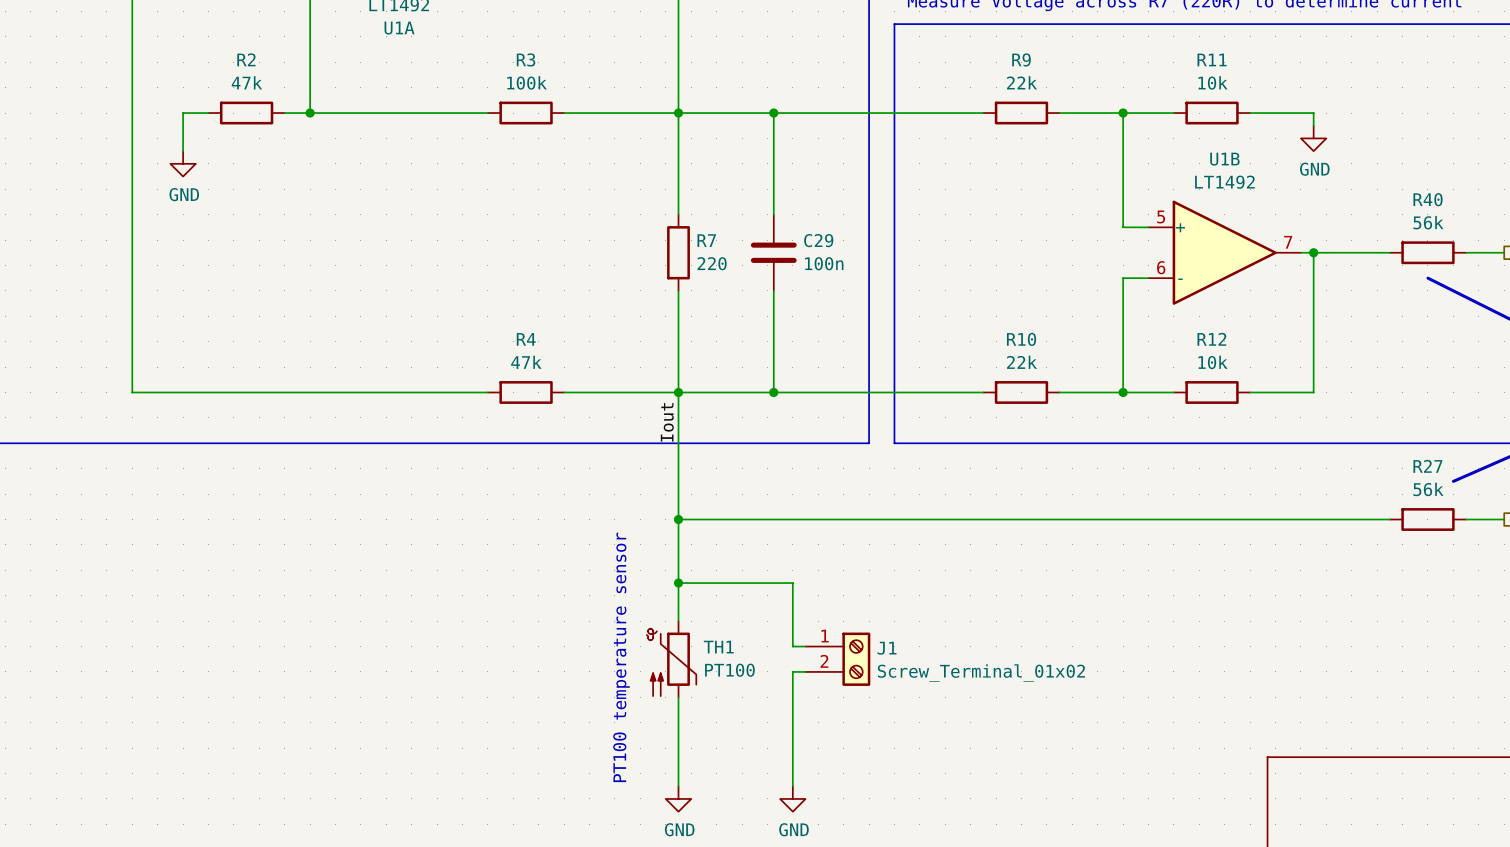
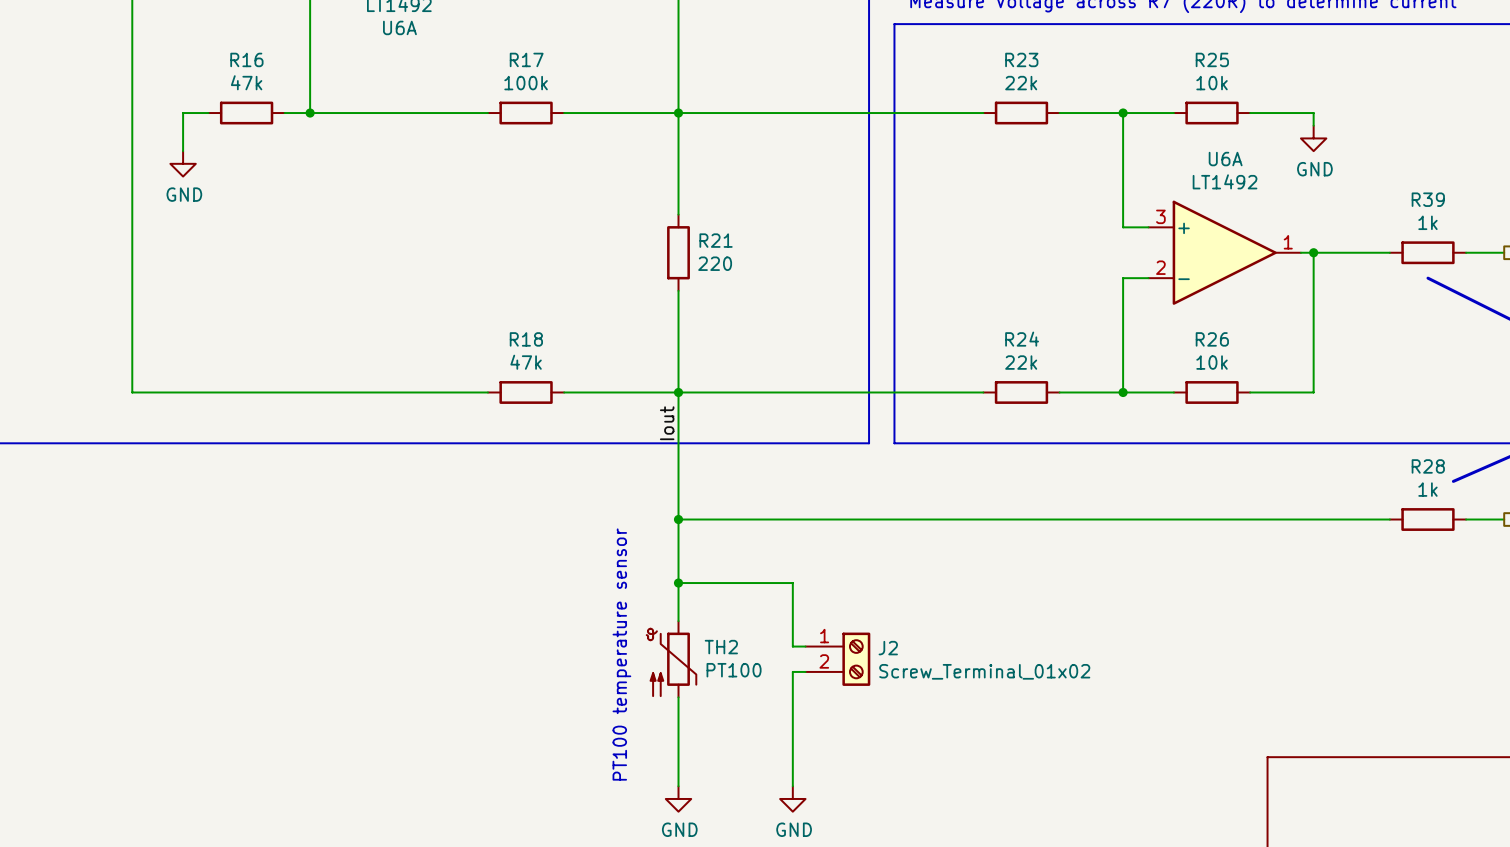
U1A name: U1A (399, 28) -> U6A (399, 27)
R2 name: R2 (246, 59) -> R16 (246, 59)
R3 name: R3 (526, 59) -> R17 (526, 59)
R9 name: R9 (1021, 59) -> R23 (1021, 59)
R11 name: R11 (1212, 59) -> R25 (1212, 59)
wire: (773, 113) (773, 214) -> none
junction: (773, 113) -> none
U1B name: U1B (1224, 159) -> U6A (1225, 159)
R40 name: R40 (1428, 199) -> R39 (1428, 199)
U1B pin number: 5 (1161, 216) -> 3 (1160, 216)
R40 value: 56k (1428, 222) -> 1k (1427, 222)
R7 name: R7 (706, 240) -> R21 (716, 240)
U1B pin number: 7 (1288, 242) -> 1 (1288, 242)
C29: 100n (773, 252) -> none
U1B pin number: 6 (1161, 267) -> 2 (1160, 267)
wire: (773, 290) (773, 392) -> none
R4 name: R4 (526, 339) -> R18 (526, 339)
R10 name: R10 (1021, 339) -> R24 (1022, 339)
R12 name: R12 (1211, 339) -> R26 (1212, 339)
junction: (773, 392) -> none
R27 name: R27 (1427, 466) -> R28 (1428, 466)
R27 value: 56k (1428, 489) -> 1k (1427, 489)
TH1 name: TH1 (718, 647) -> TH2 (721, 647)
J1 name: J1 (887, 648) -> J2 (888, 648)

